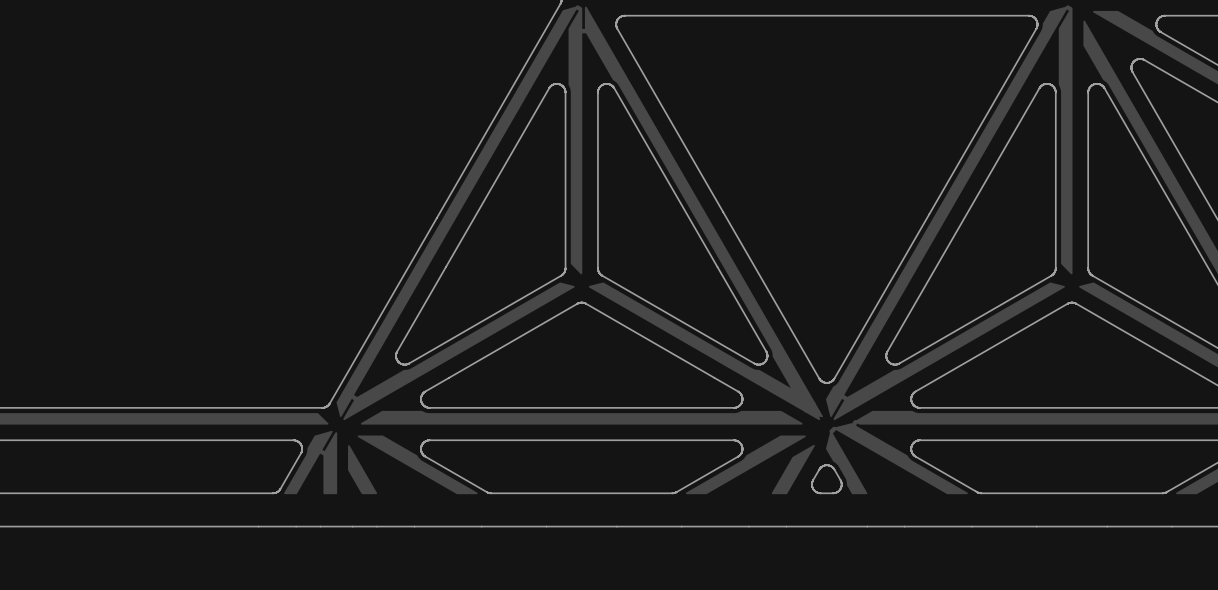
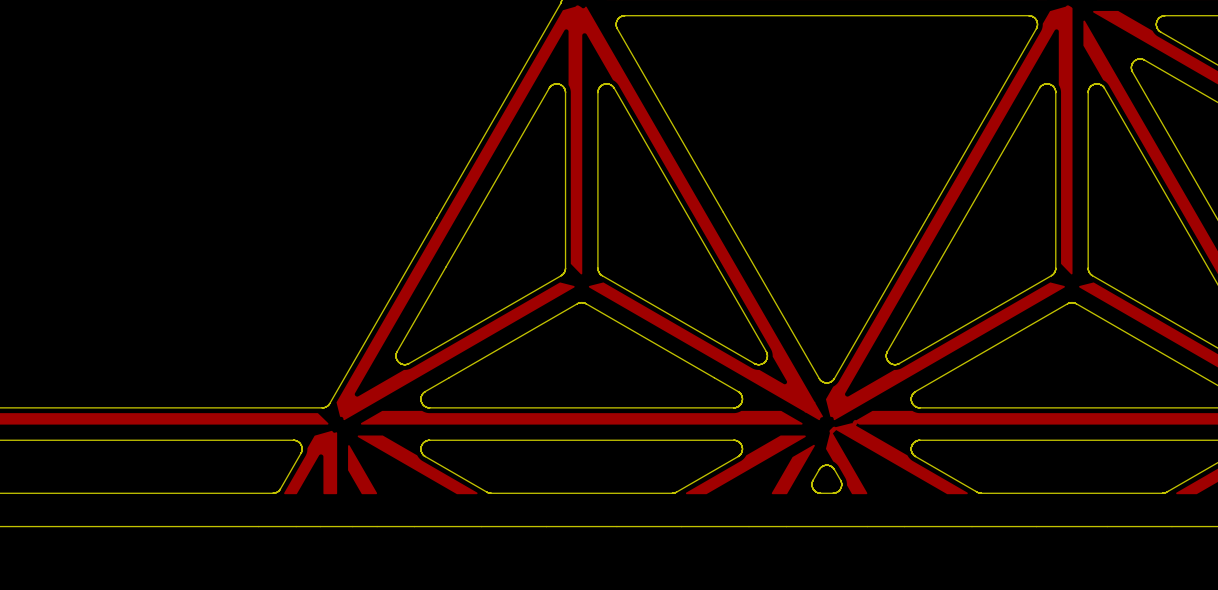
drawing shape: [336, 5, 823, 421] -> [336, 5, 823, 421]
drawing shape: [826, 5, 1073, 421] -> [826, 5, 1073, 421]
drawing shape: [284, 430, 338, 495] -> [284, 430, 338, 495]

